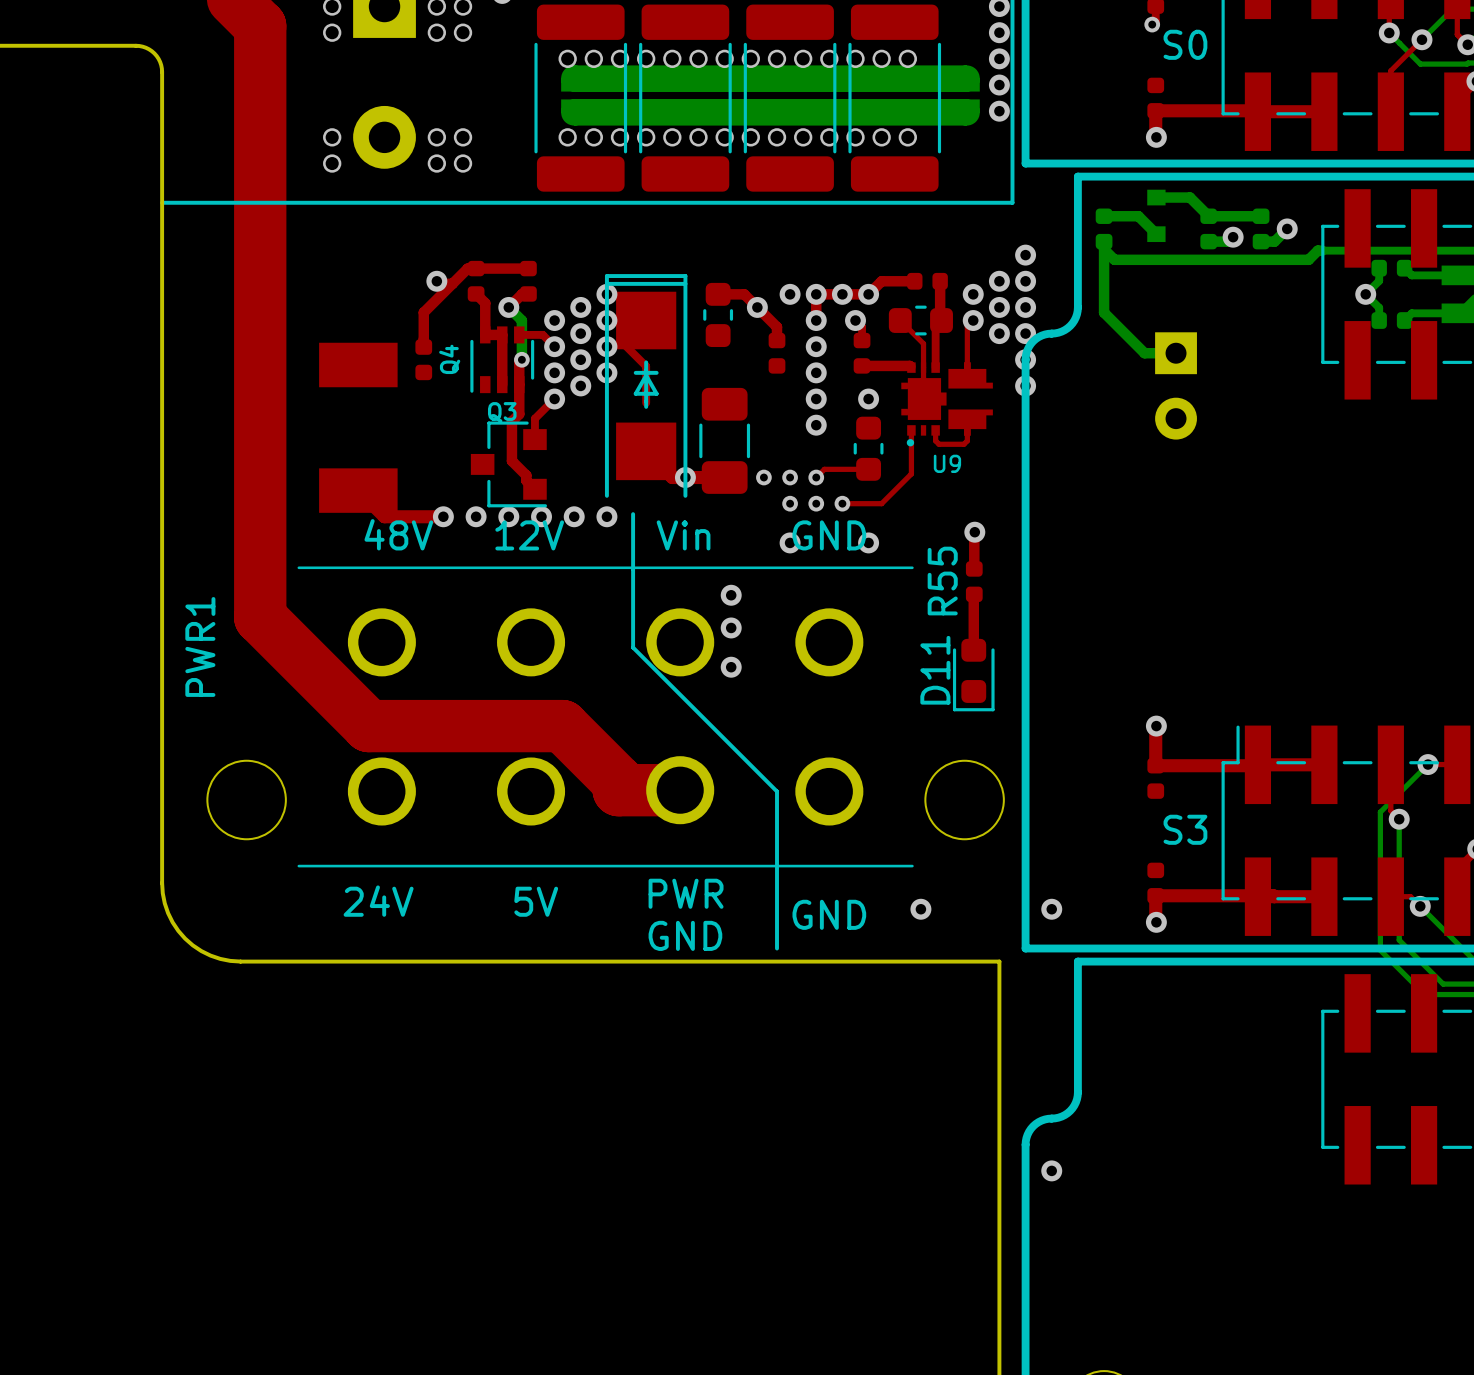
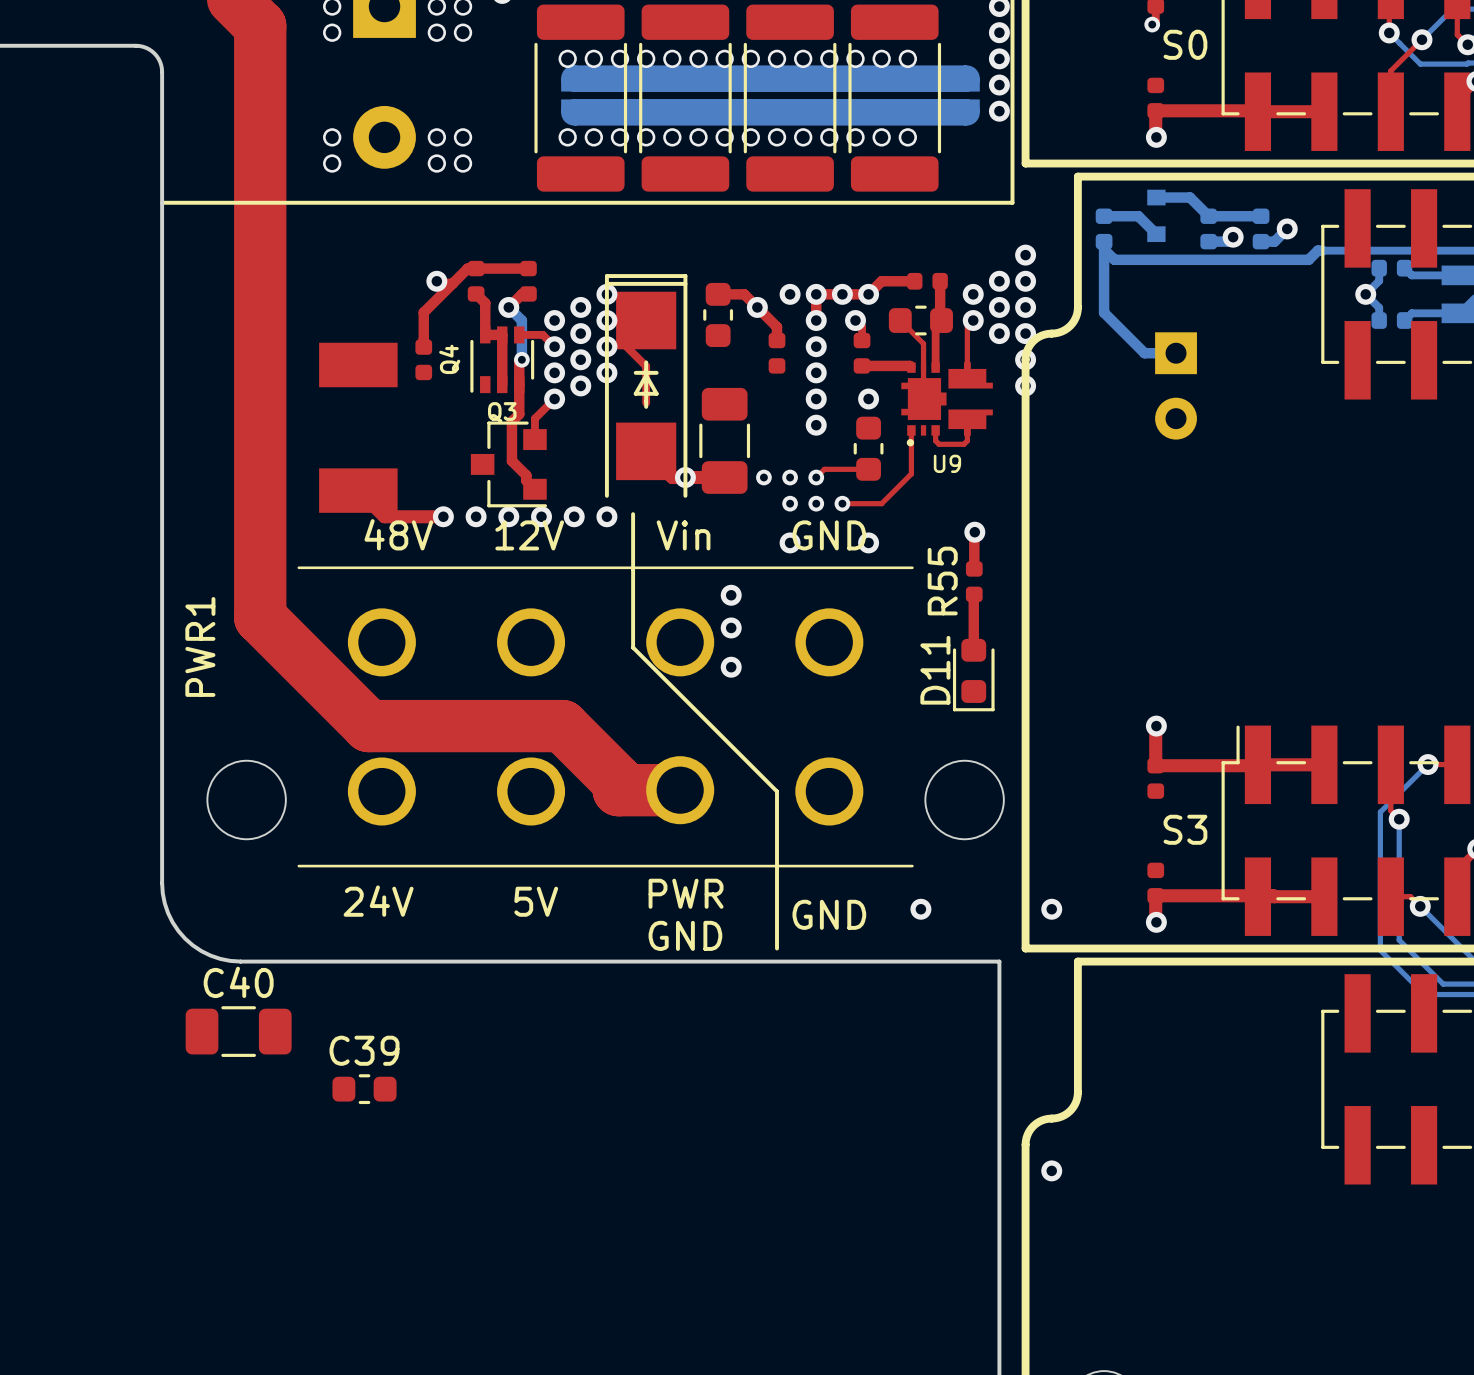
C40: none -> (238, 1031)
C39: none -> (364, 1089)

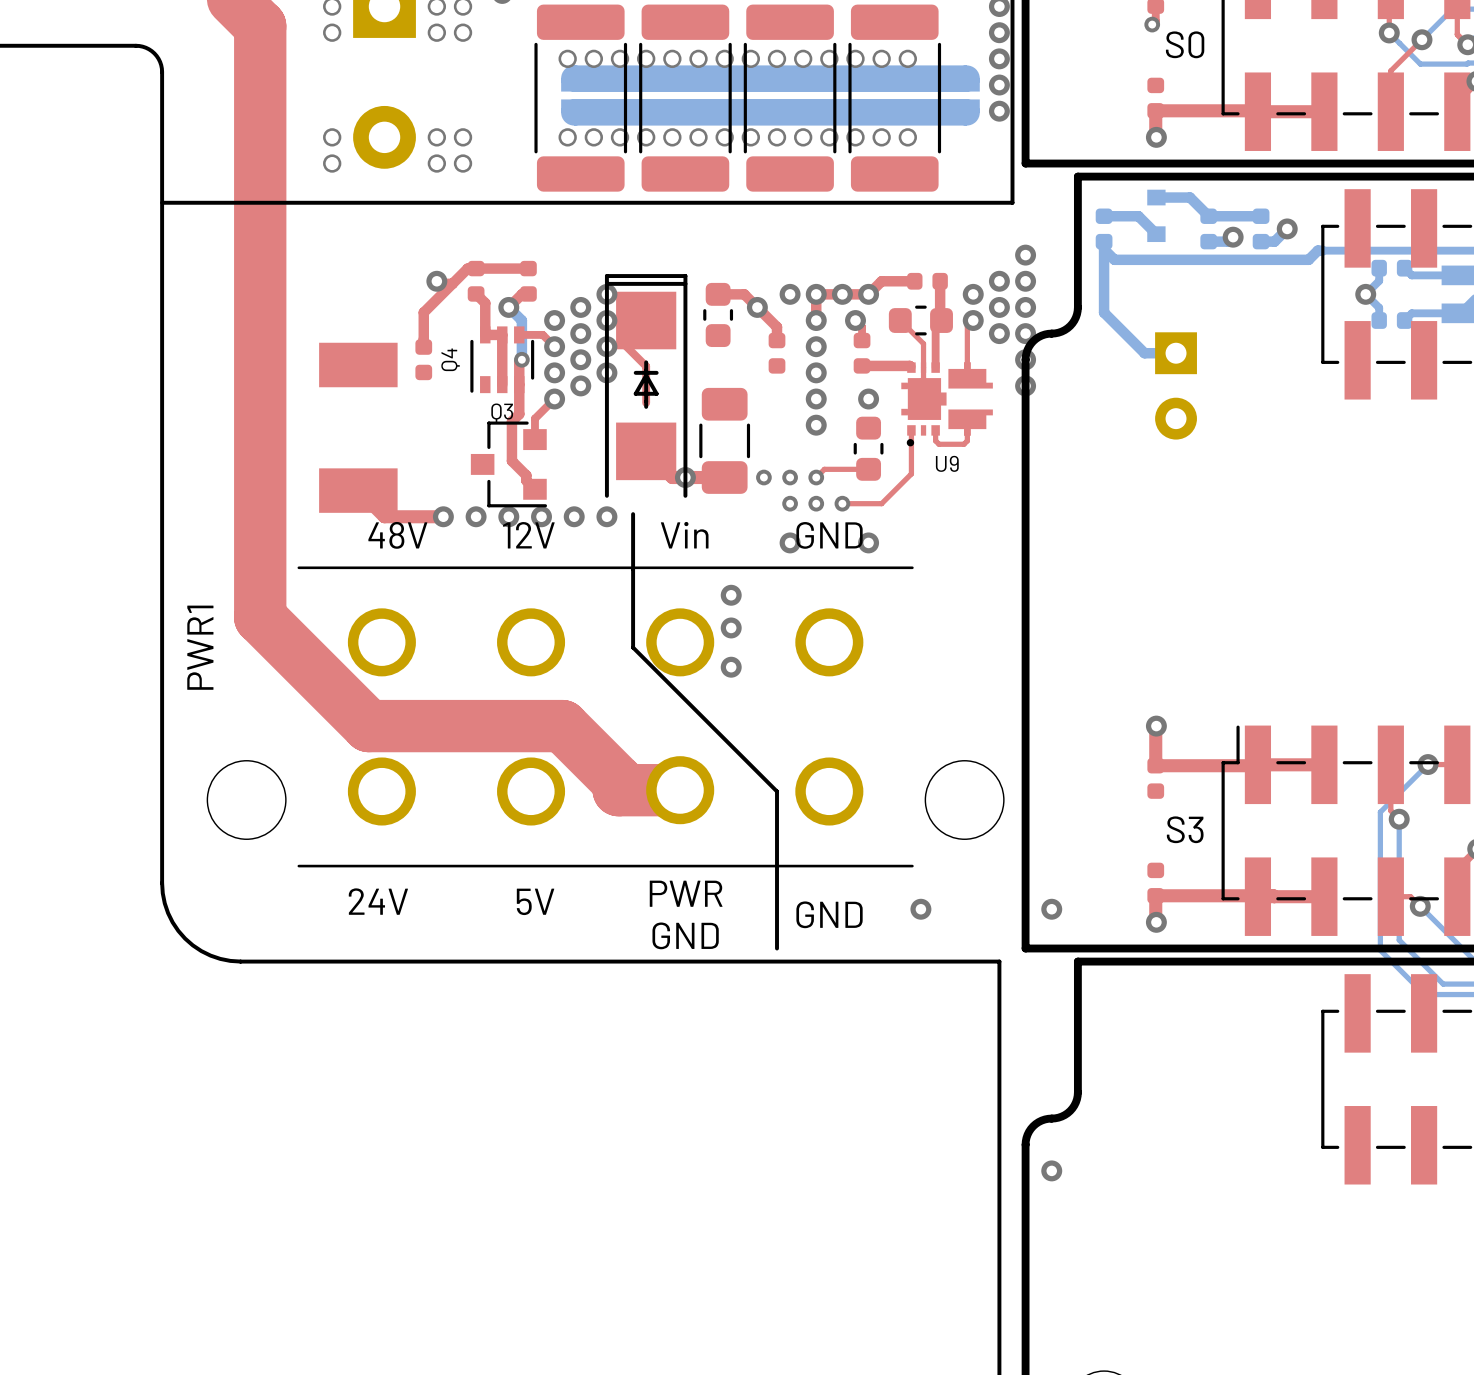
top track: (974, 532) (974, 568) -> none
via: (974, 532) -> none
R55: (974, 581) -> none
top track: (974, 594) (973, 650) -> none
D11: (973, 675) -> none
C40: (238, 1031) -> none
C39: (364, 1089) -> none

